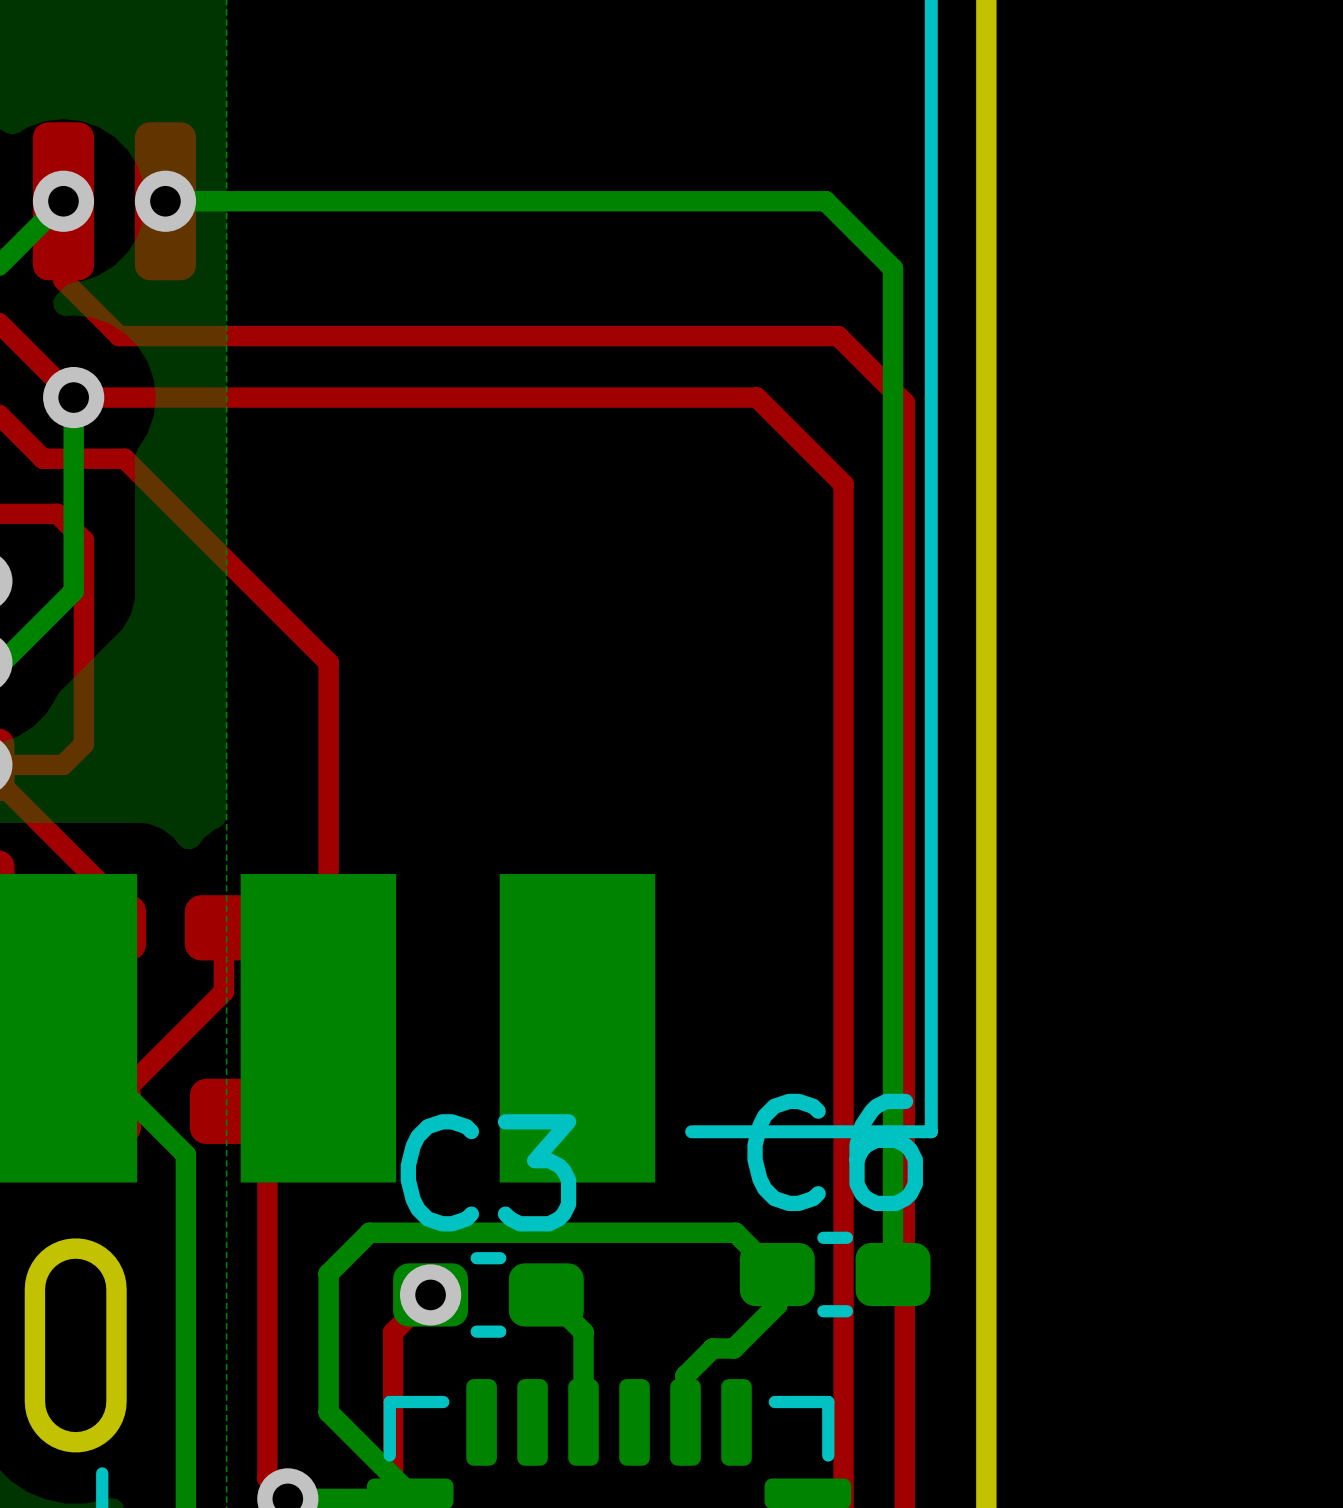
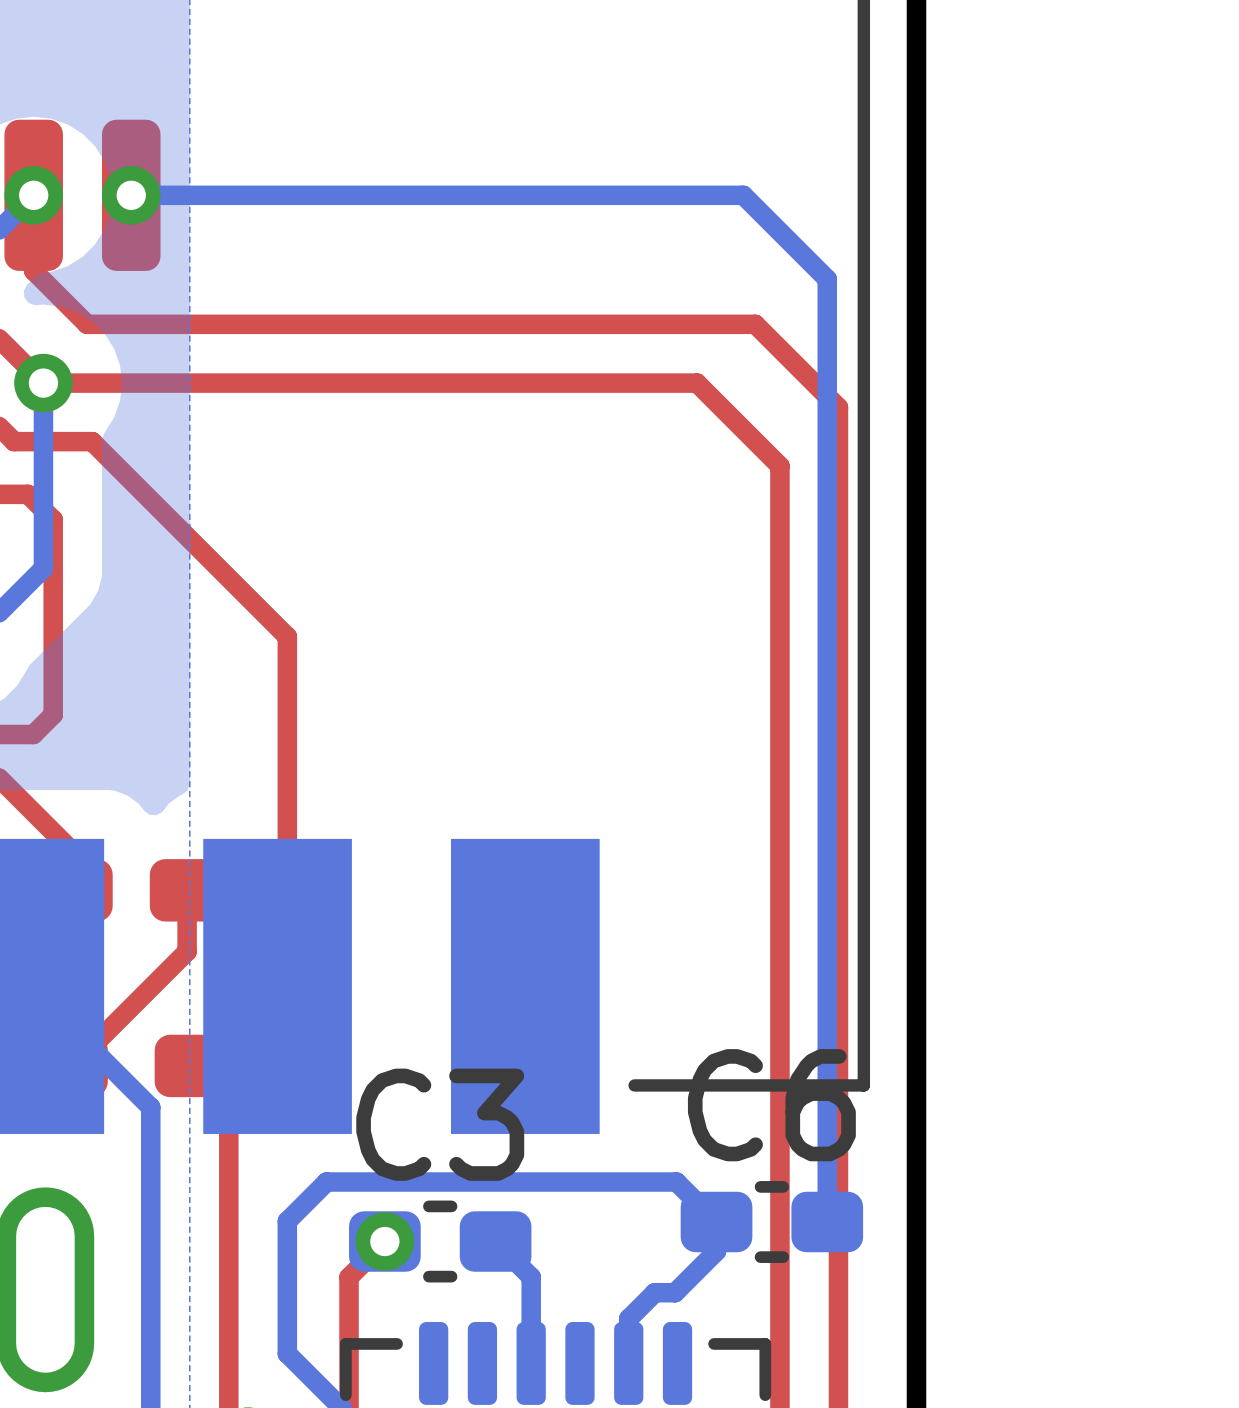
bottom track: (805, 201) (825, 201) (893, 268) (893, 288) -> (743, 195) (827, 279)
top track: (817, 336) (838, 336) (904, 402) (904, 423) -> (755, 324) (838, 407)

